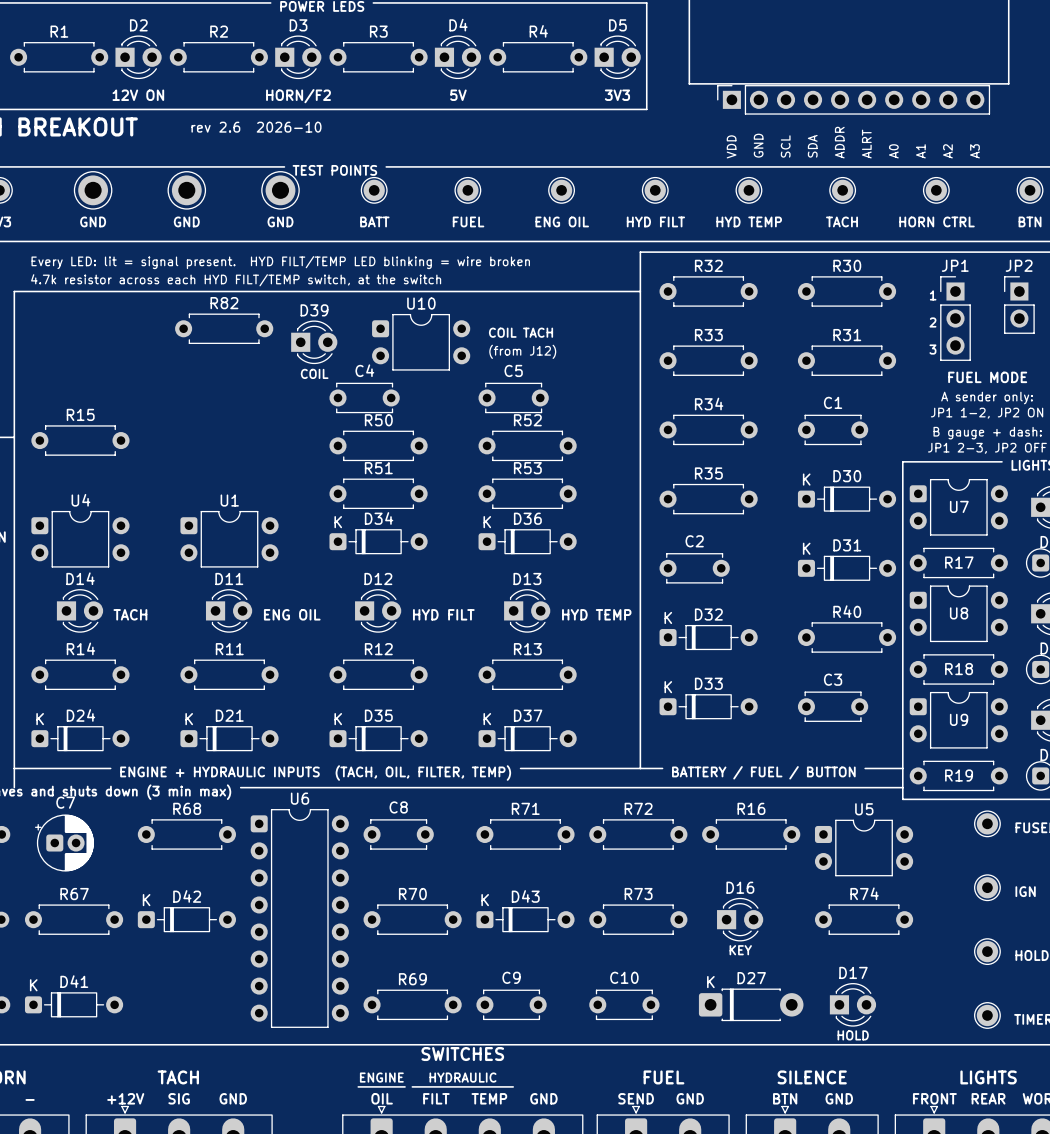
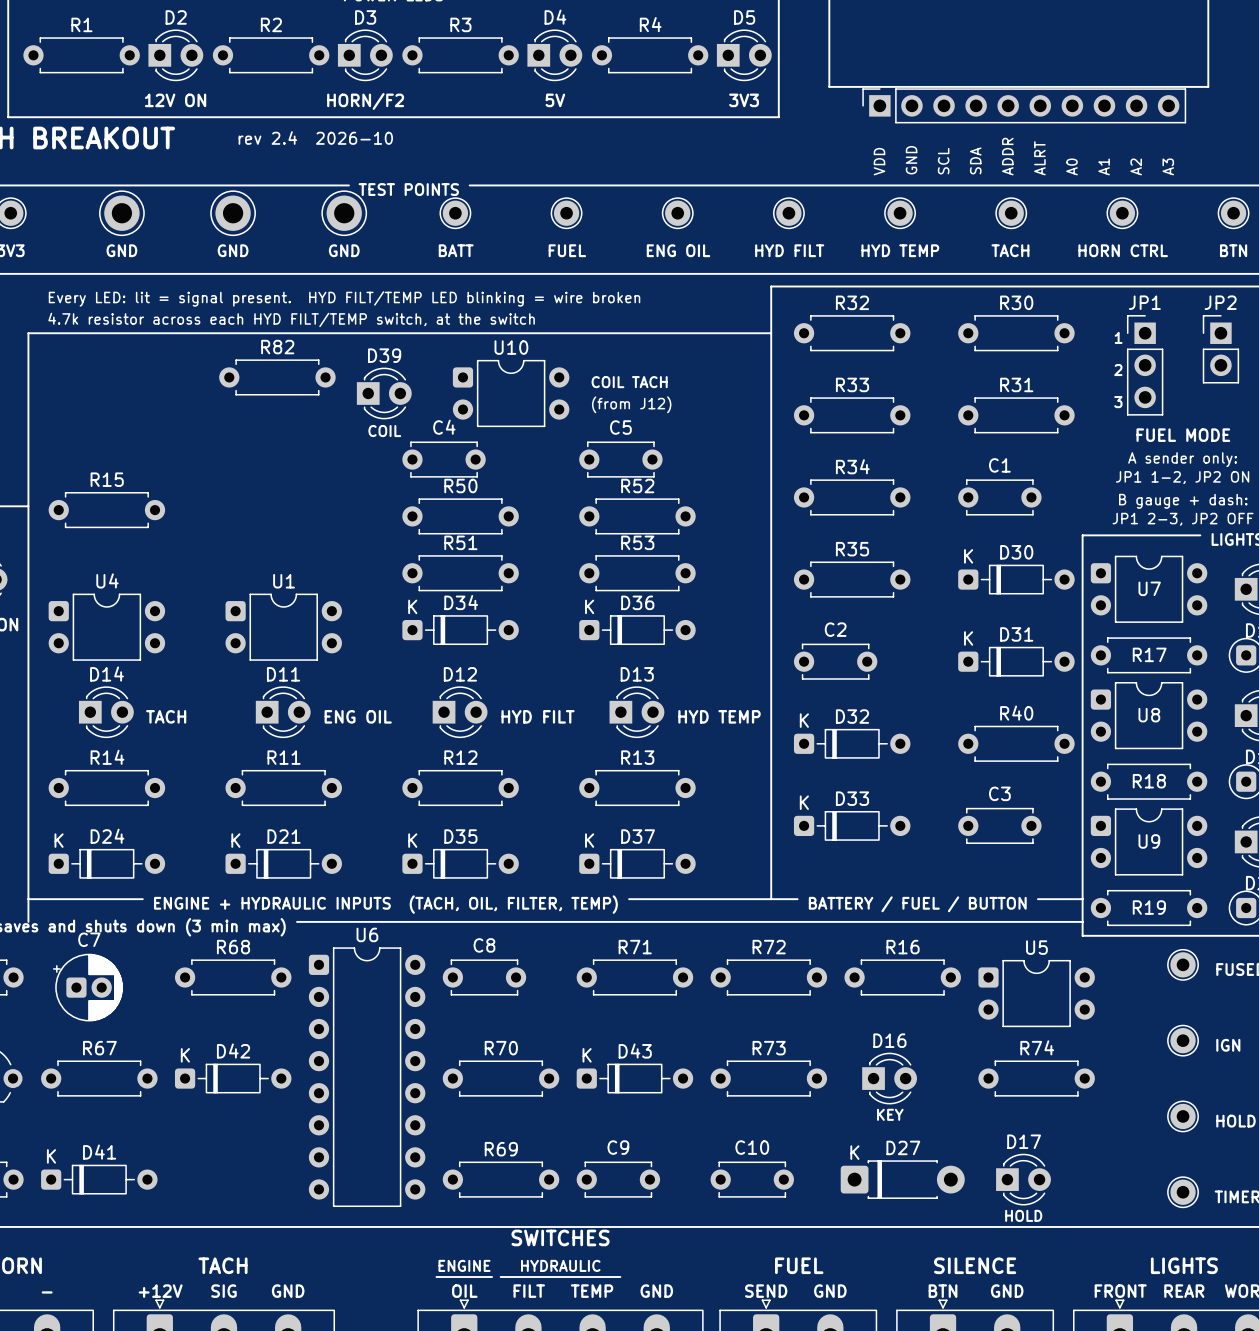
text: rev 2.6 2026-10 (256, 127) -> rev 2.4 2026-10 (315, 138)

